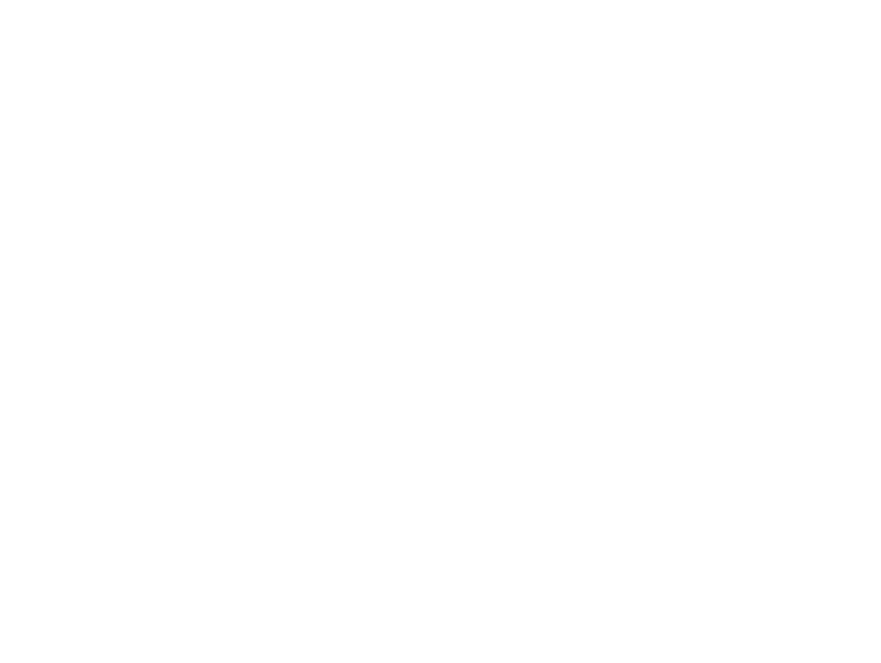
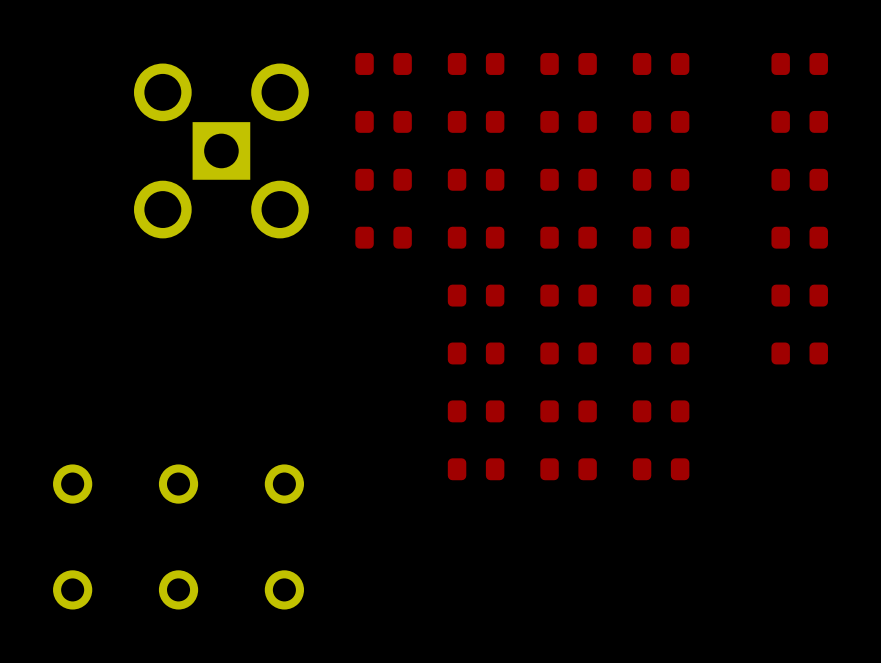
part: none -> (383, 63)
part: none -> (476, 63)
part: none -> (568, 63)
part: none -> (661, 63)
part: none -> (799, 63)
part: none -> (383, 121)
part: none -> (476, 121)
part: none -> (568, 121)
part: none -> (661, 121)
part: none -> (799, 121)
part: none -> (221, 150)
part: none -> (383, 179)
part: none -> (476, 179)
part: none -> (568, 179)
part: none -> (661, 179)
part: none -> (799, 179)
part: none -> (383, 237)
part: none -> (476, 237)
part: none -> (568, 237)
part: none -> (661, 237)
part: none -> (799, 237)
part: none -> (476, 295)
part: none -> (568, 295)
part: none -> (661, 295)
part: none -> (799, 295)
part: none -> (476, 353)
part: none -> (568, 353)
part: none -> (661, 353)
part: none -> (799, 353)
part: none -> (476, 411)
part: none -> (568, 411)
part: none -> (661, 411)
part: none -> (476, 469)
part: none -> (568, 469)
part: none -> (661, 469)
part: none -> (72, 484)
part: none -> (178, 484)
part: none -> (284, 484)
part: none -> (72, 589)
part: none -> (178, 589)
part: none -> (284, 589)

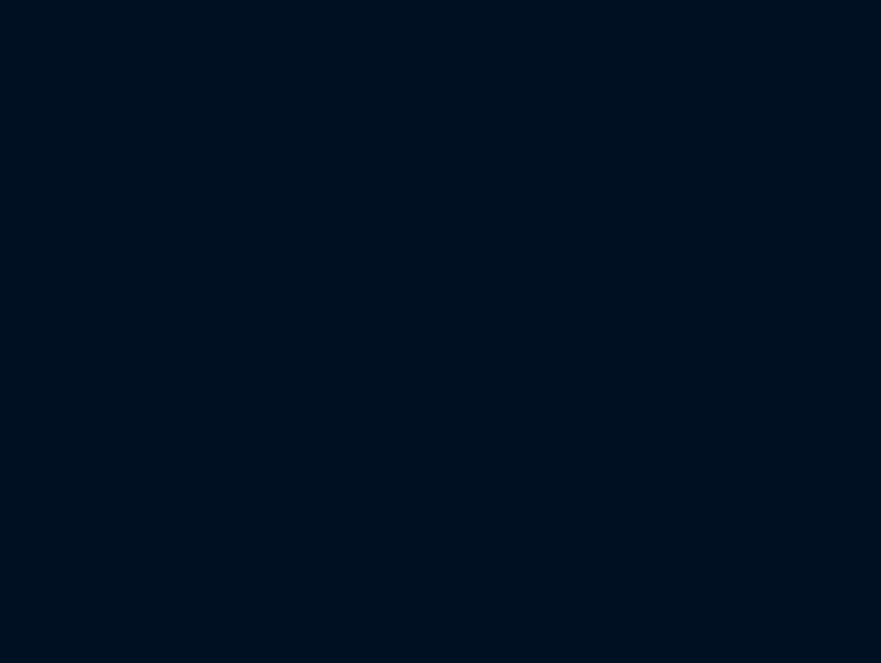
part: (383, 63) -> none
part: (476, 63) -> none
part: (568, 63) -> none
part: (661, 63) -> none
part: (799, 63) -> none
part: (383, 121) -> none
part: (476, 121) -> none
part: (568, 121) -> none
part: (661, 121) -> none
part: (799, 121) -> none
part: (221, 150) -> none
part: (383, 179) -> none
part: (476, 179) -> none
part: (568, 179) -> none
part: (661, 179) -> none
part: (799, 179) -> none
part: (383, 237) -> none
part: (476, 237) -> none
part: (568, 237) -> none
part: (661, 237) -> none
part: (799, 237) -> none
part: (476, 295) -> none
part: (568, 295) -> none
part: (661, 295) -> none
part: (799, 295) -> none
part: (476, 353) -> none
part: (568, 353) -> none
part: (661, 353) -> none
part: (799, 353) -> none
part: (476, 411) -> none
part: (568, 411) -> none
part: (661, 411) -> none
part: (476, 469) -> none
part: (568, 469) -> none
part: (661, 469) -> none
part: (72, 484) -> none
part: (178, 484) -> none
part: (284, 484) -> none
part: (72, 589) -> none
part: (178, 589) -> none
part: (284, 589) -> none

